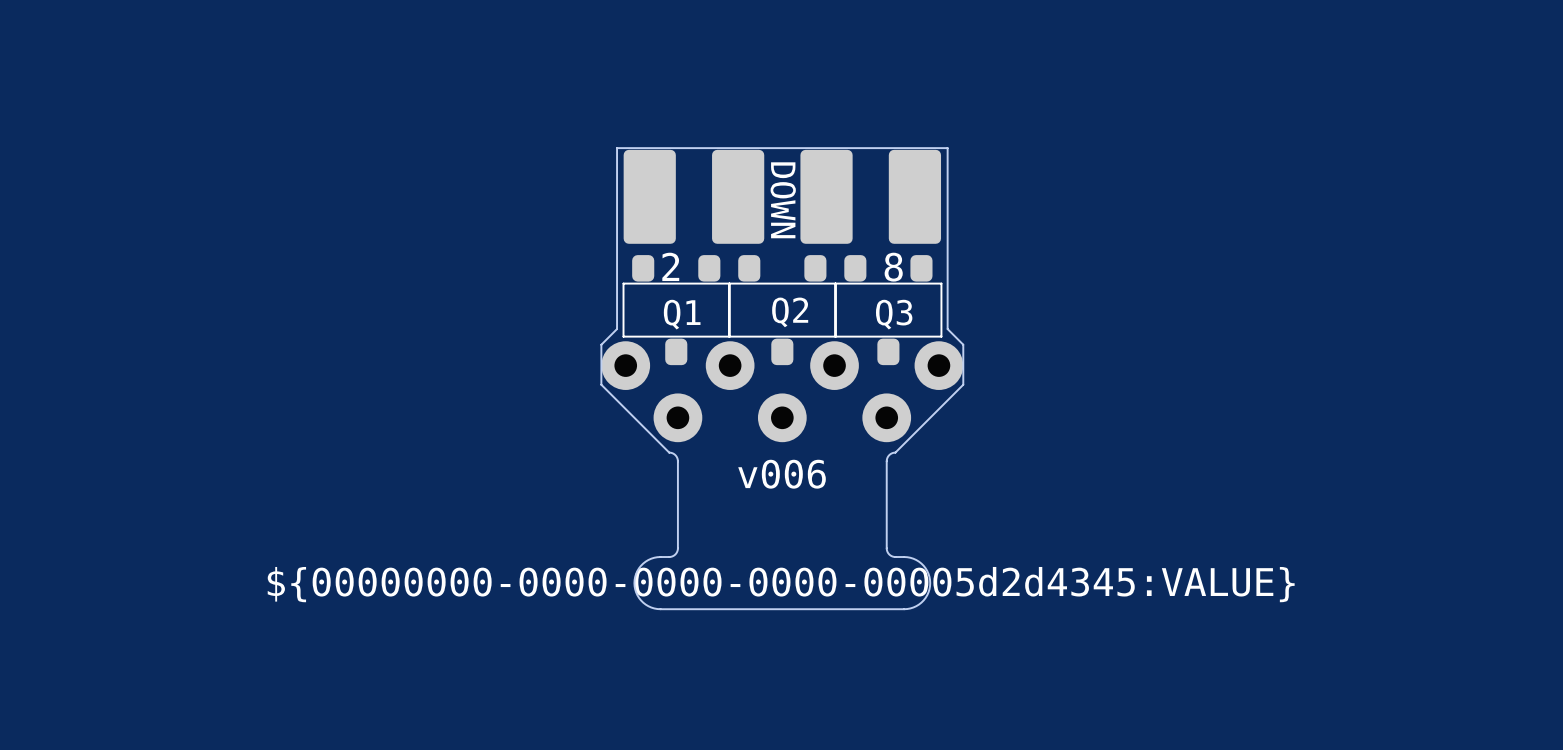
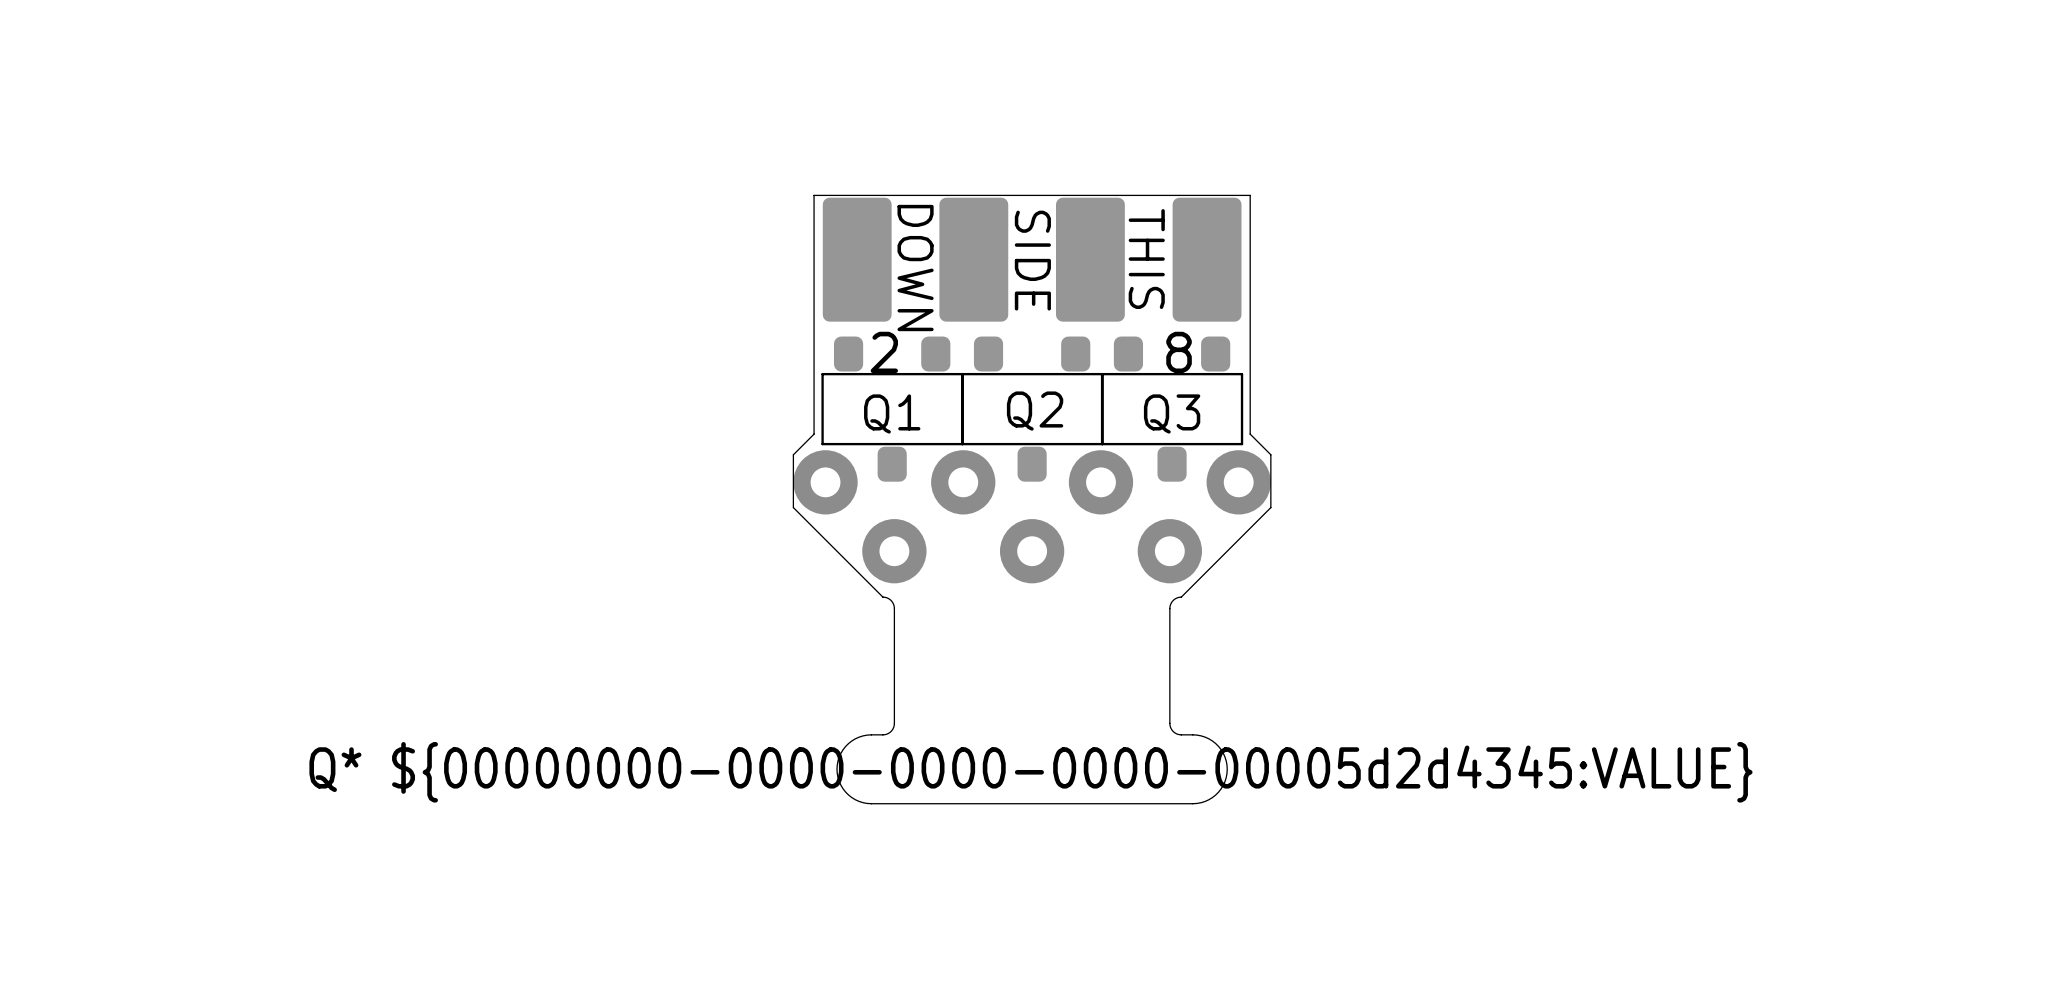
text: none -> THIS (1146, 259)
text: DOWN (783, 200) -> SIDE (1032, 260)
text: none -> DOWN (915, 268)
text: v006 (782, 474) -> none
text: ${00000000-0000-0000-0000-00005d2d4345:VALUE} (781, 584) -> Q* ${00000000-0000-0000-0000-00005d2d4345:VALUE} (1030, 772)

